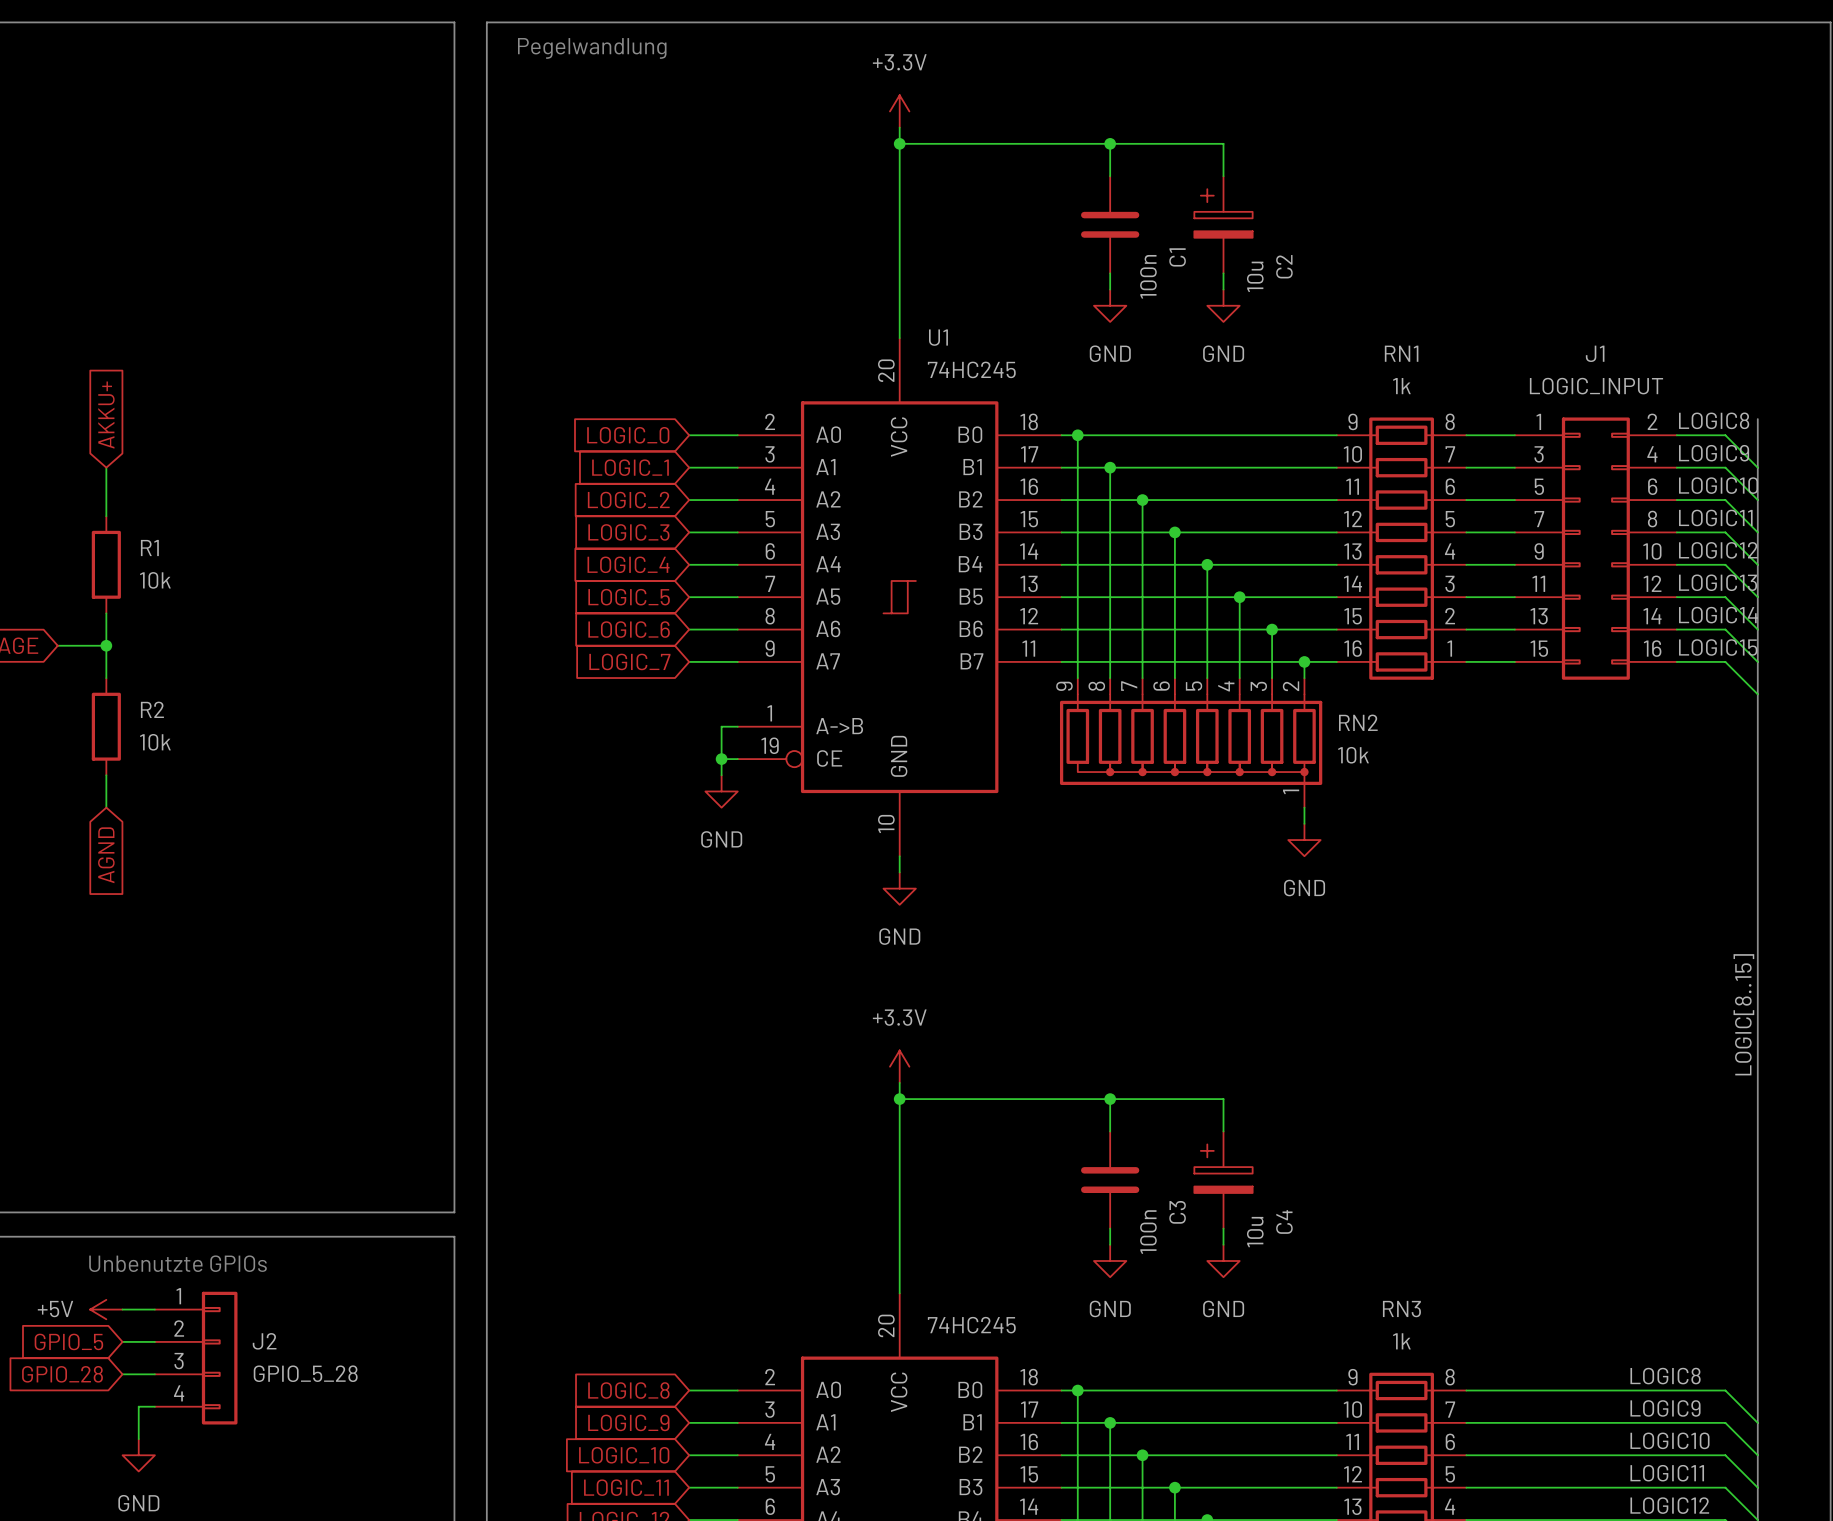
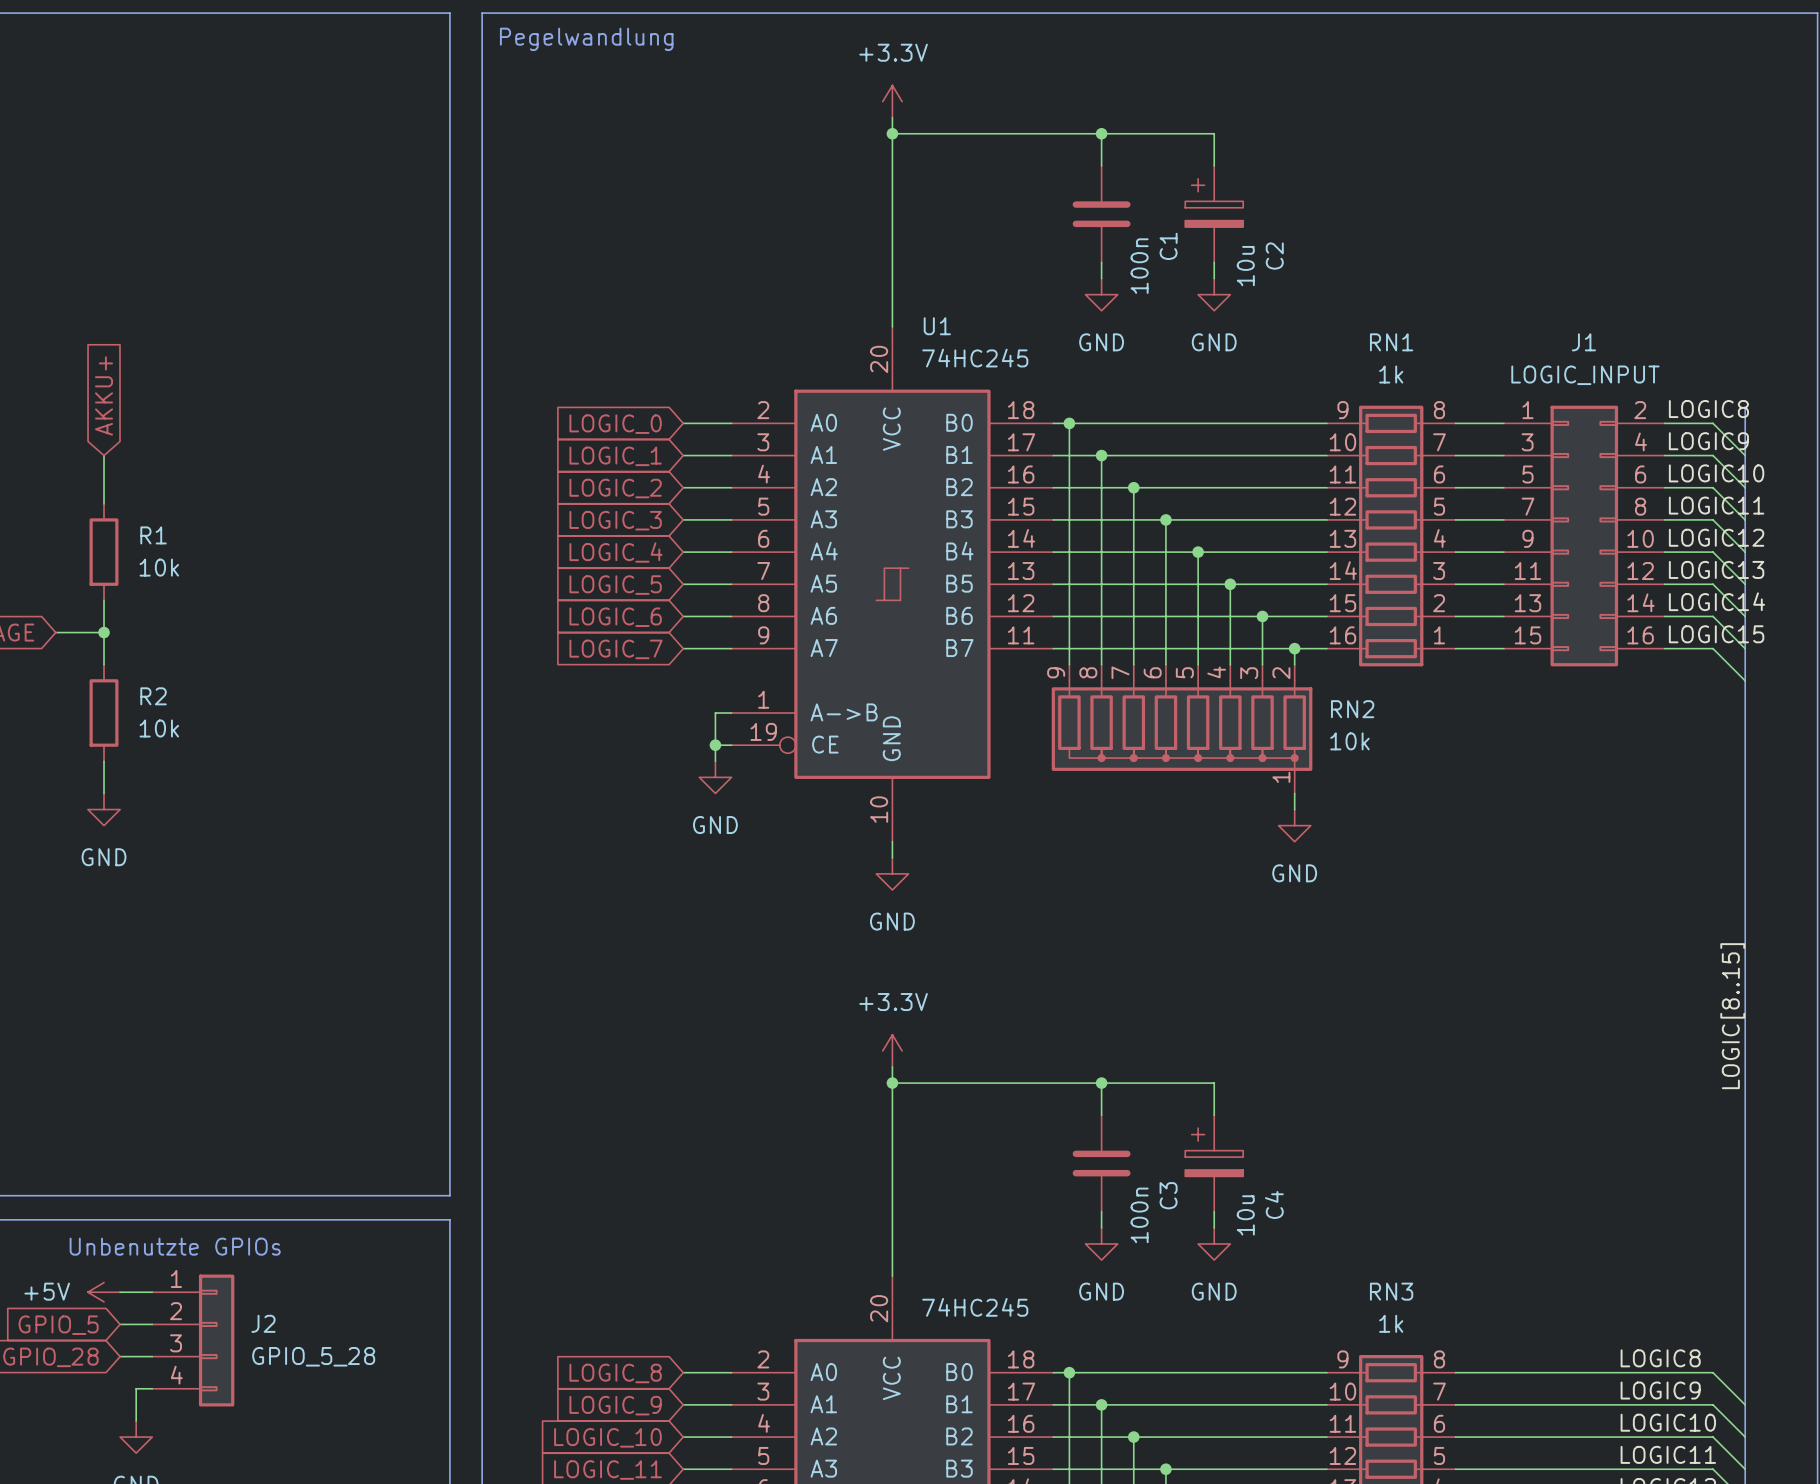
power symbol: none -> GND (104, 809)
global label: AGND (106, 855) -> none

